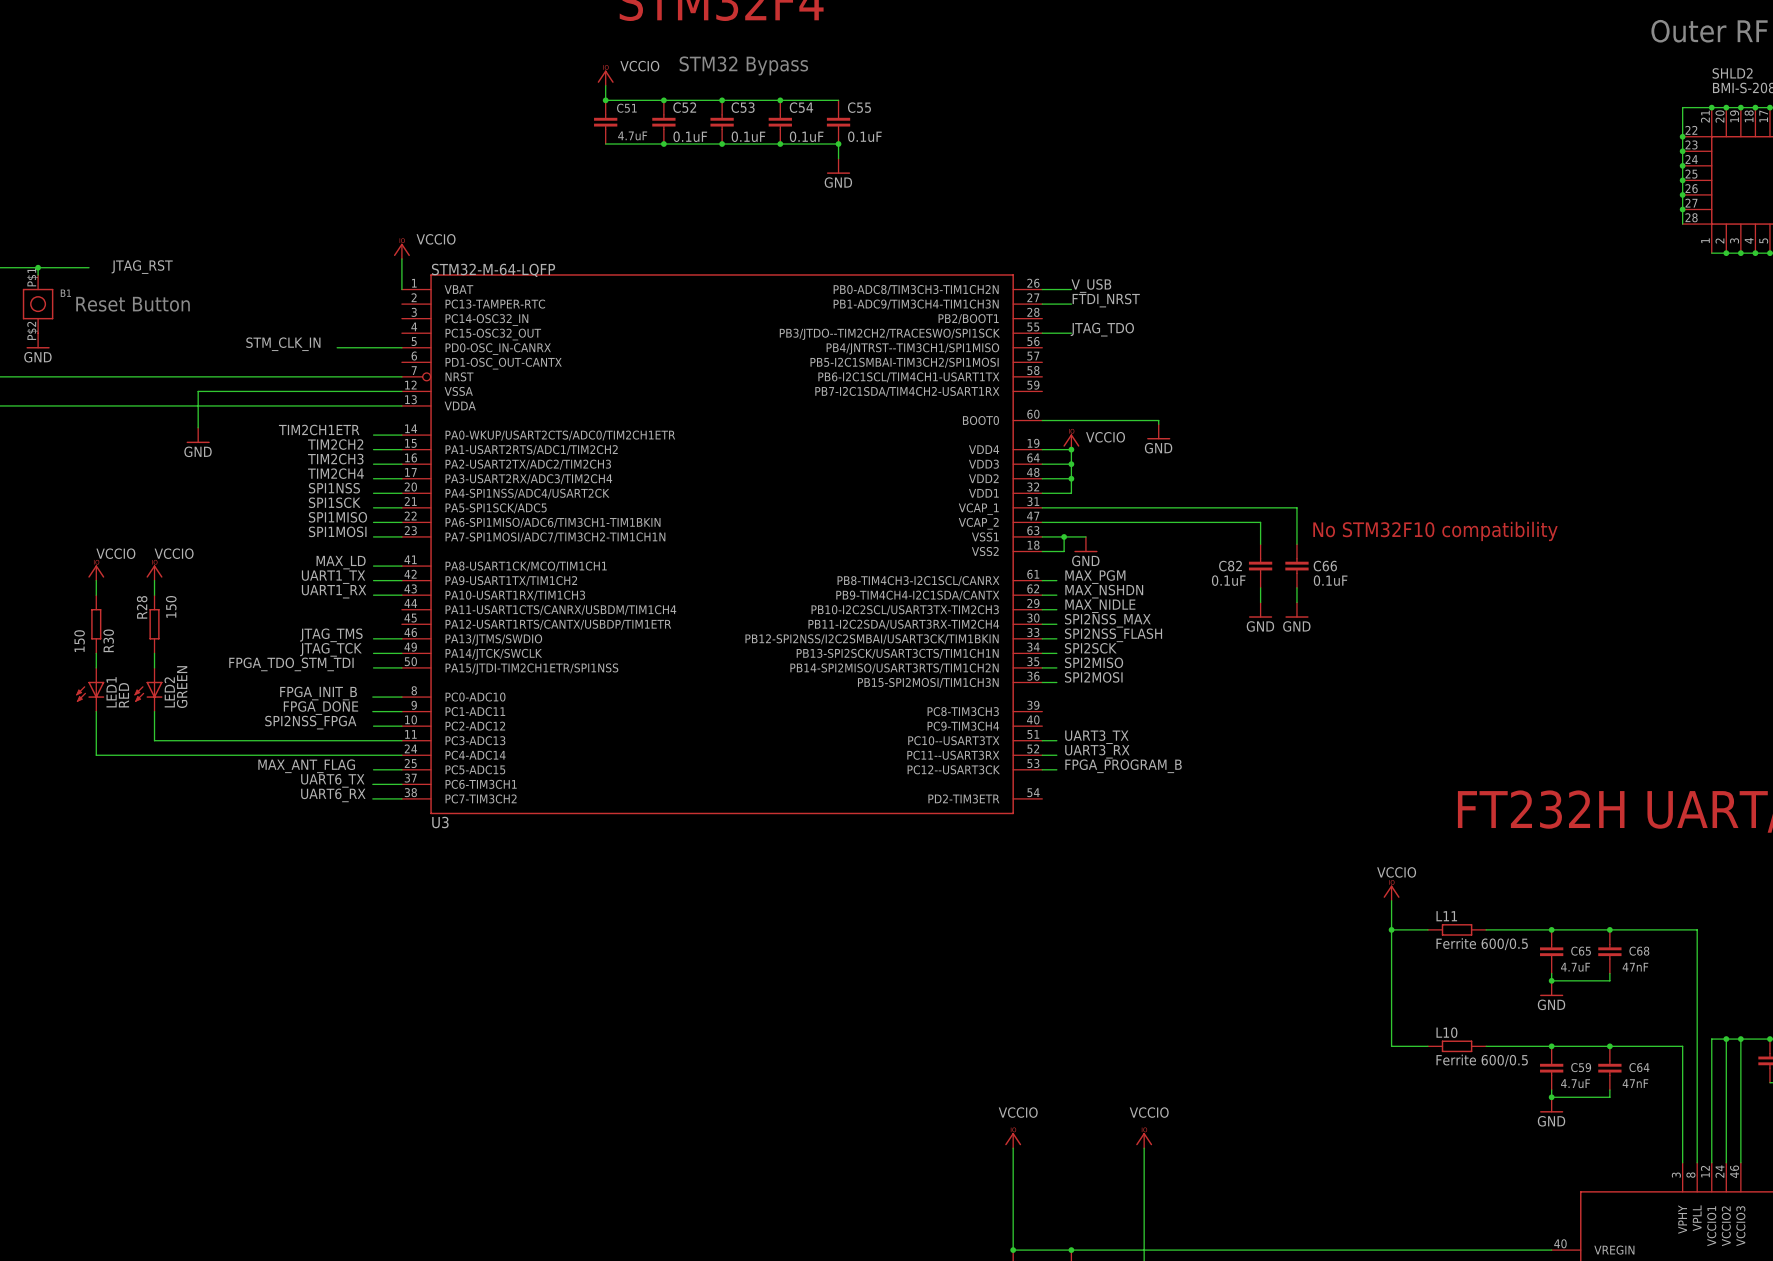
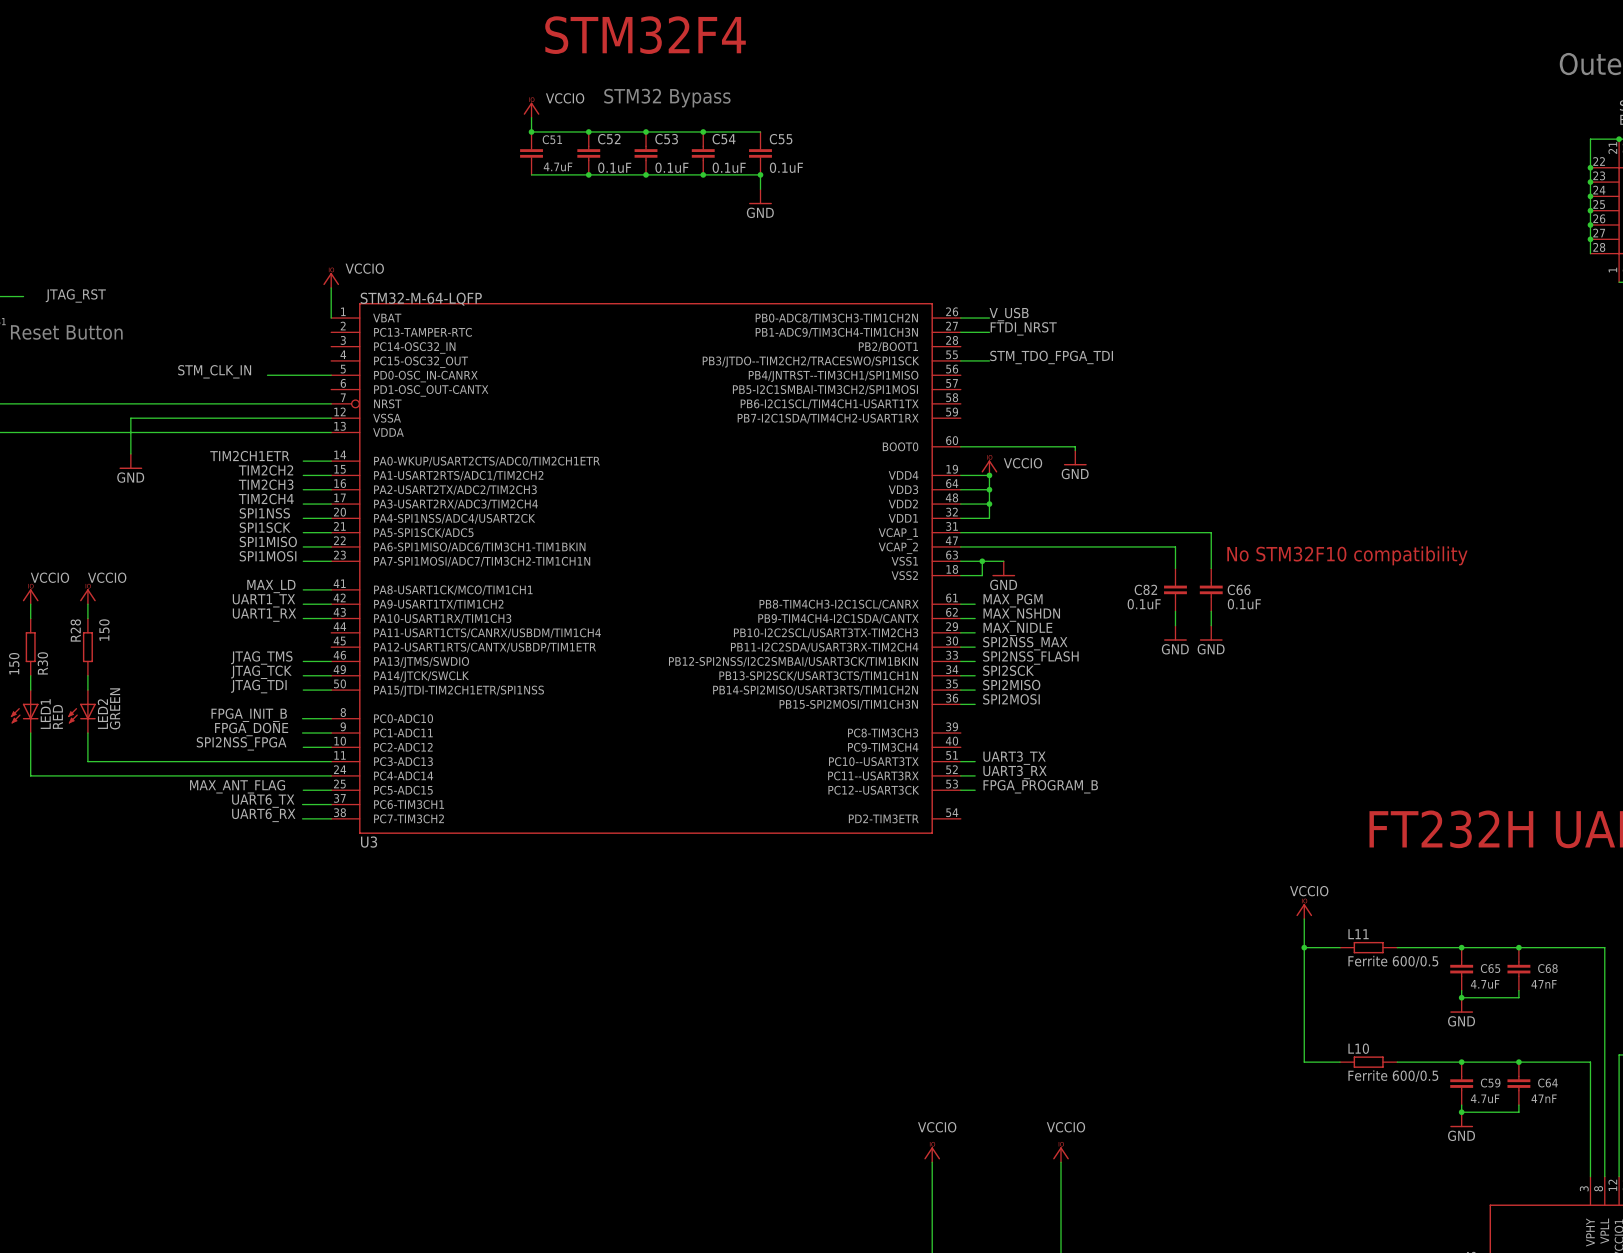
label: JTAG_TDO (1102, 329) -> STM_TDO_FPGA_TDI (1051, 357)
label: FPGA_TDO_STM_TDI (291, 664) -> none
label: none -> JTAG_TDI (258, 686)

